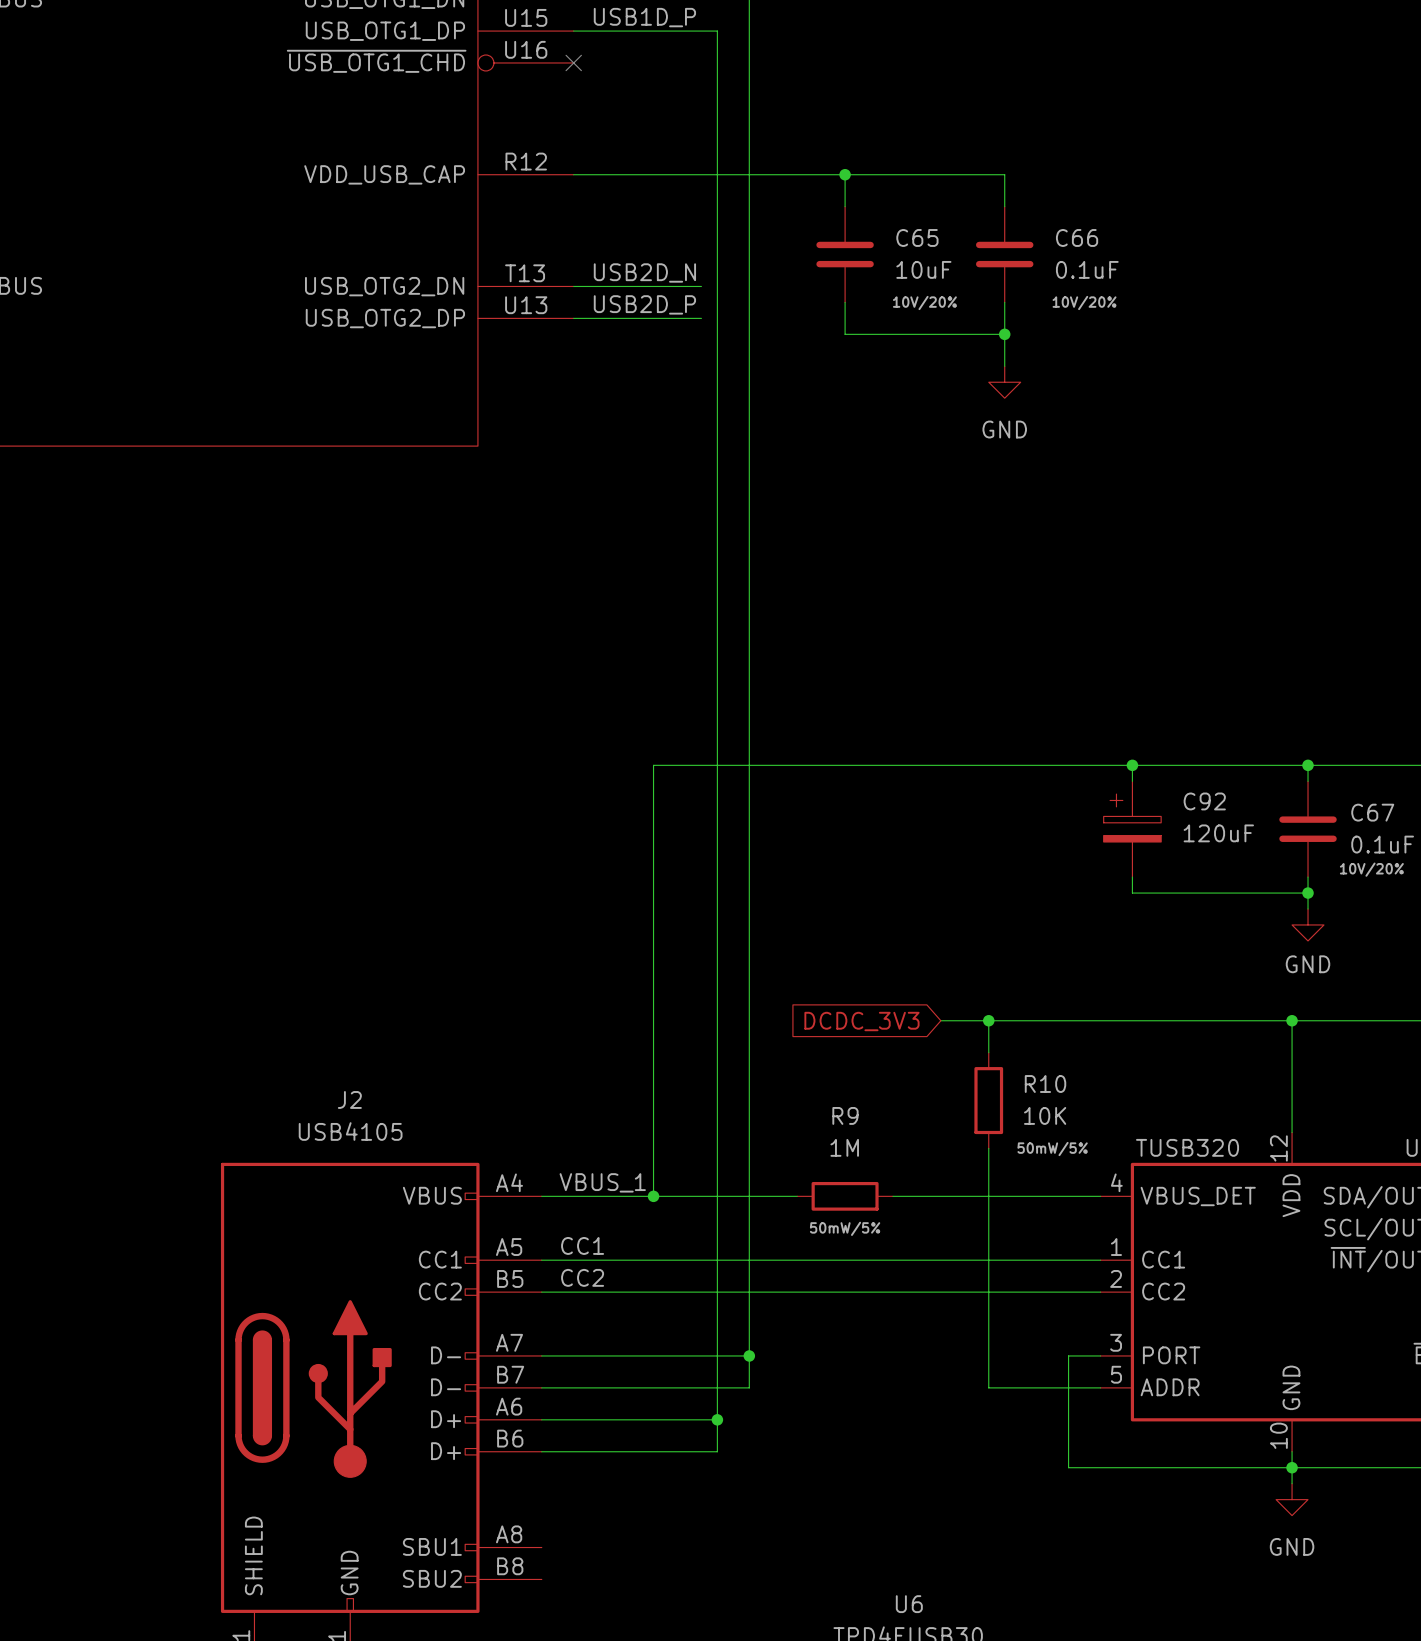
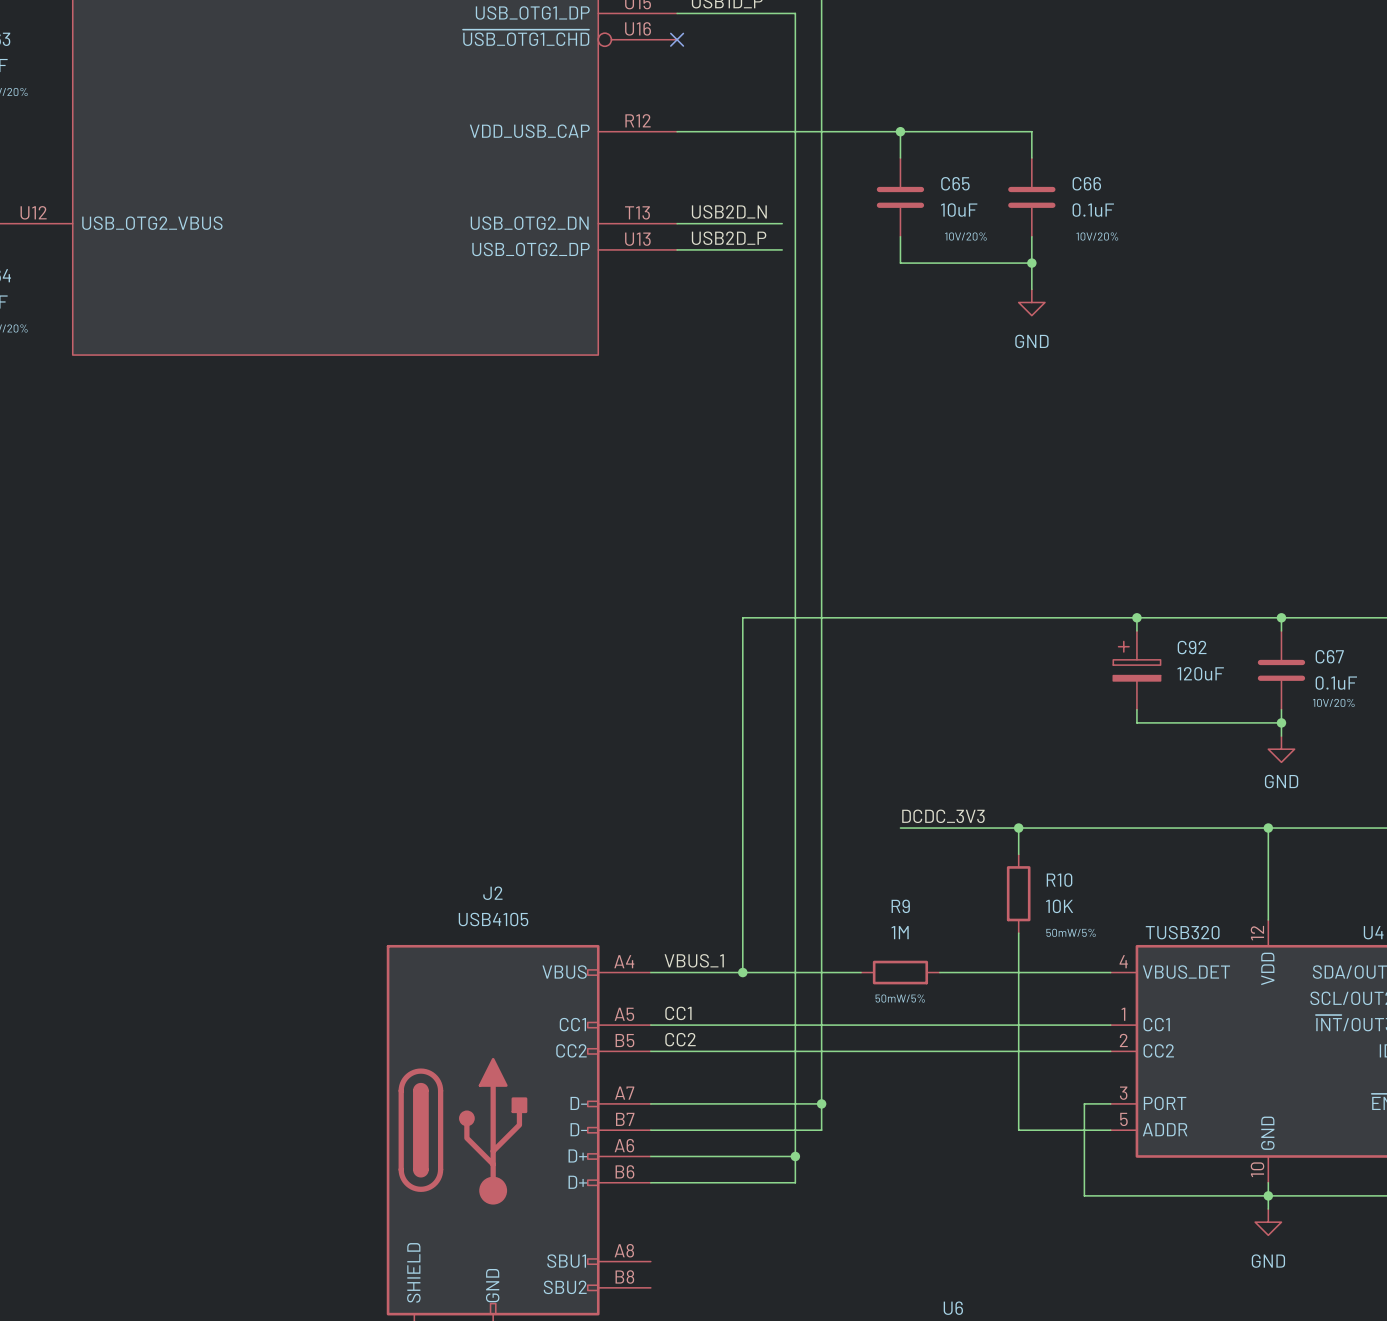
label: none -> DCDC_3V3 (943, 816)
wire: none -> (900, 828) (979, 828)
global label: DCDC_3V3 (861, 1021) -> none

